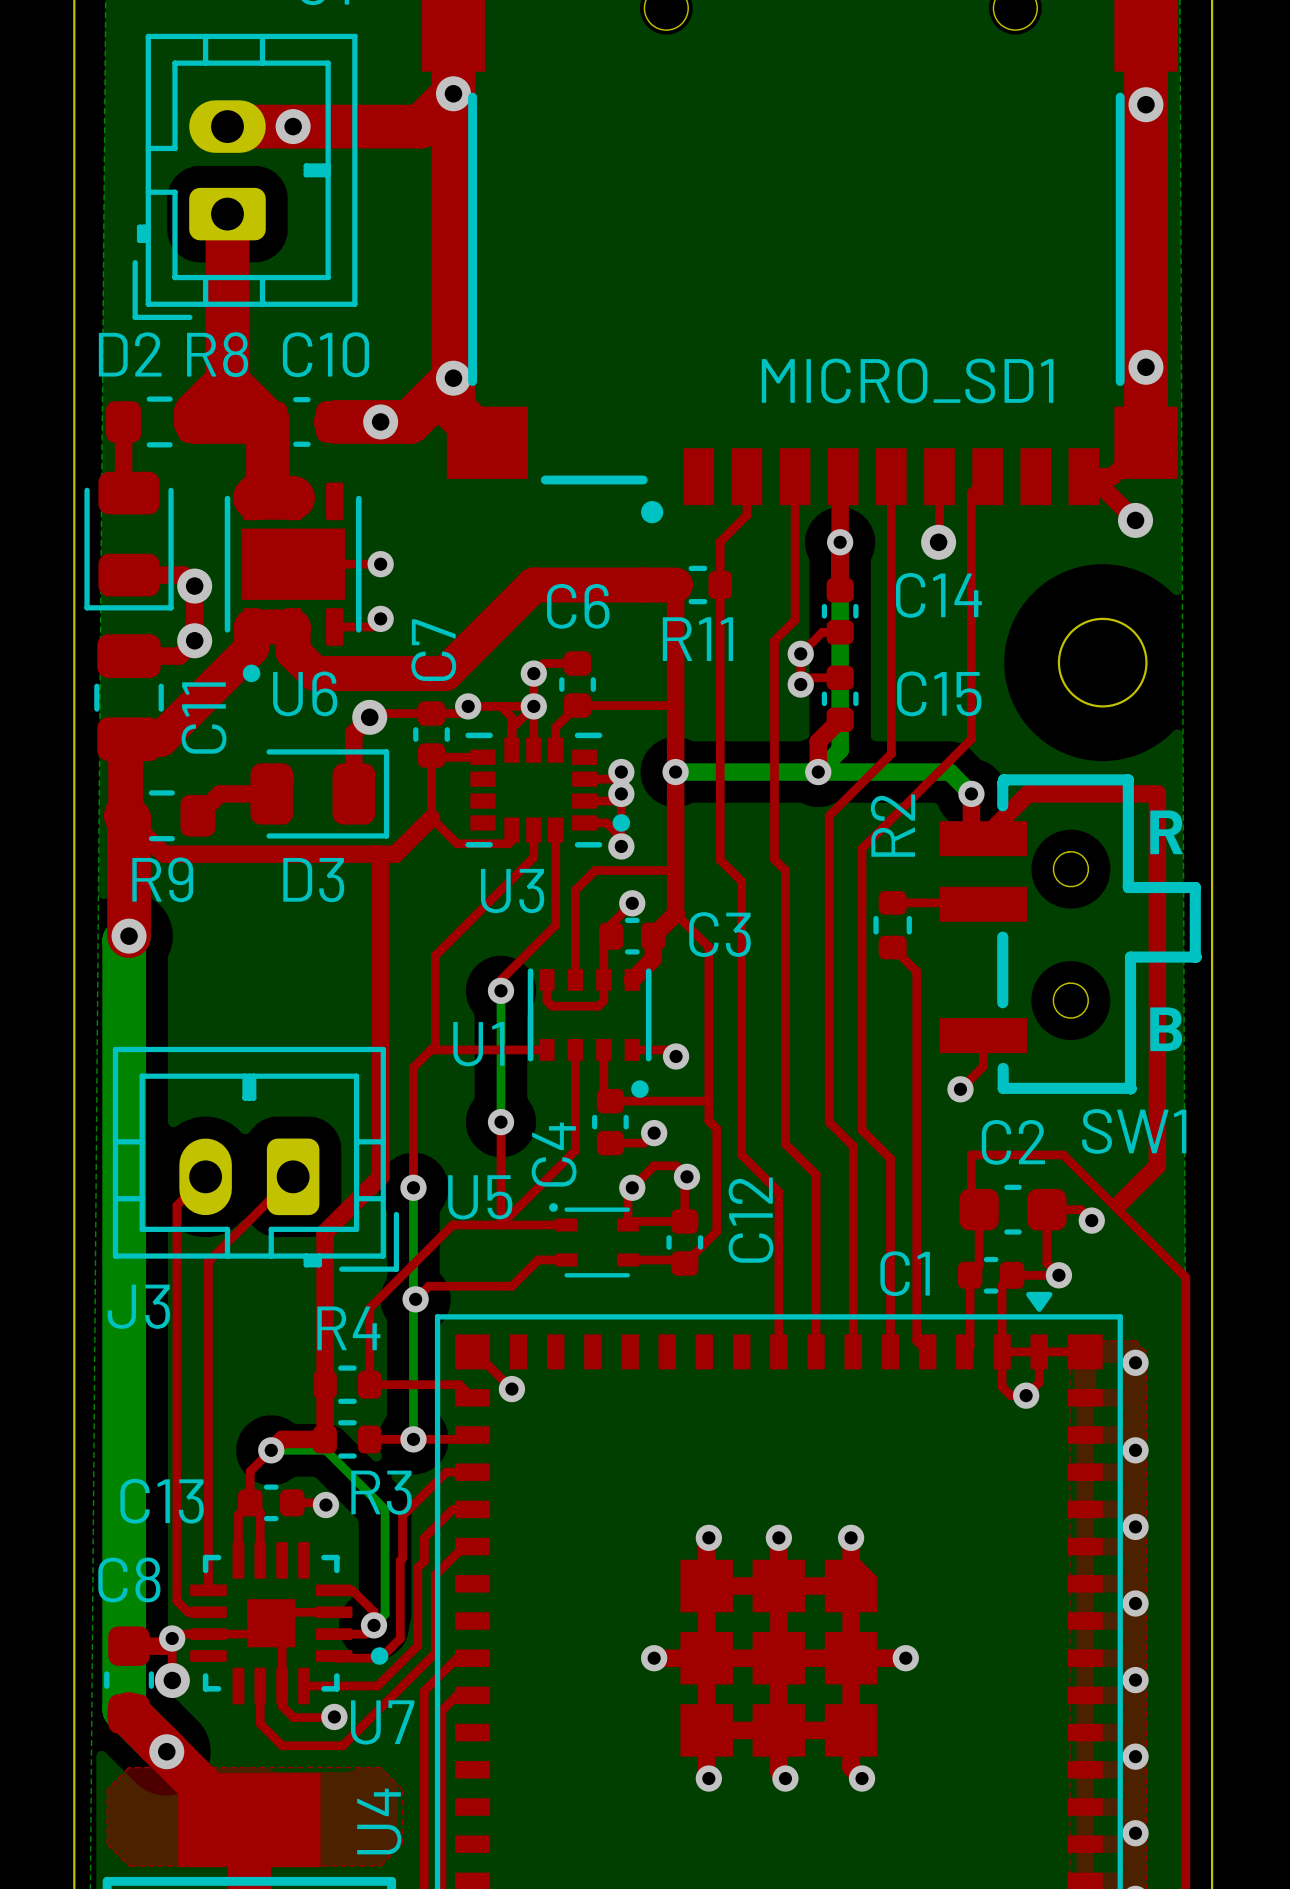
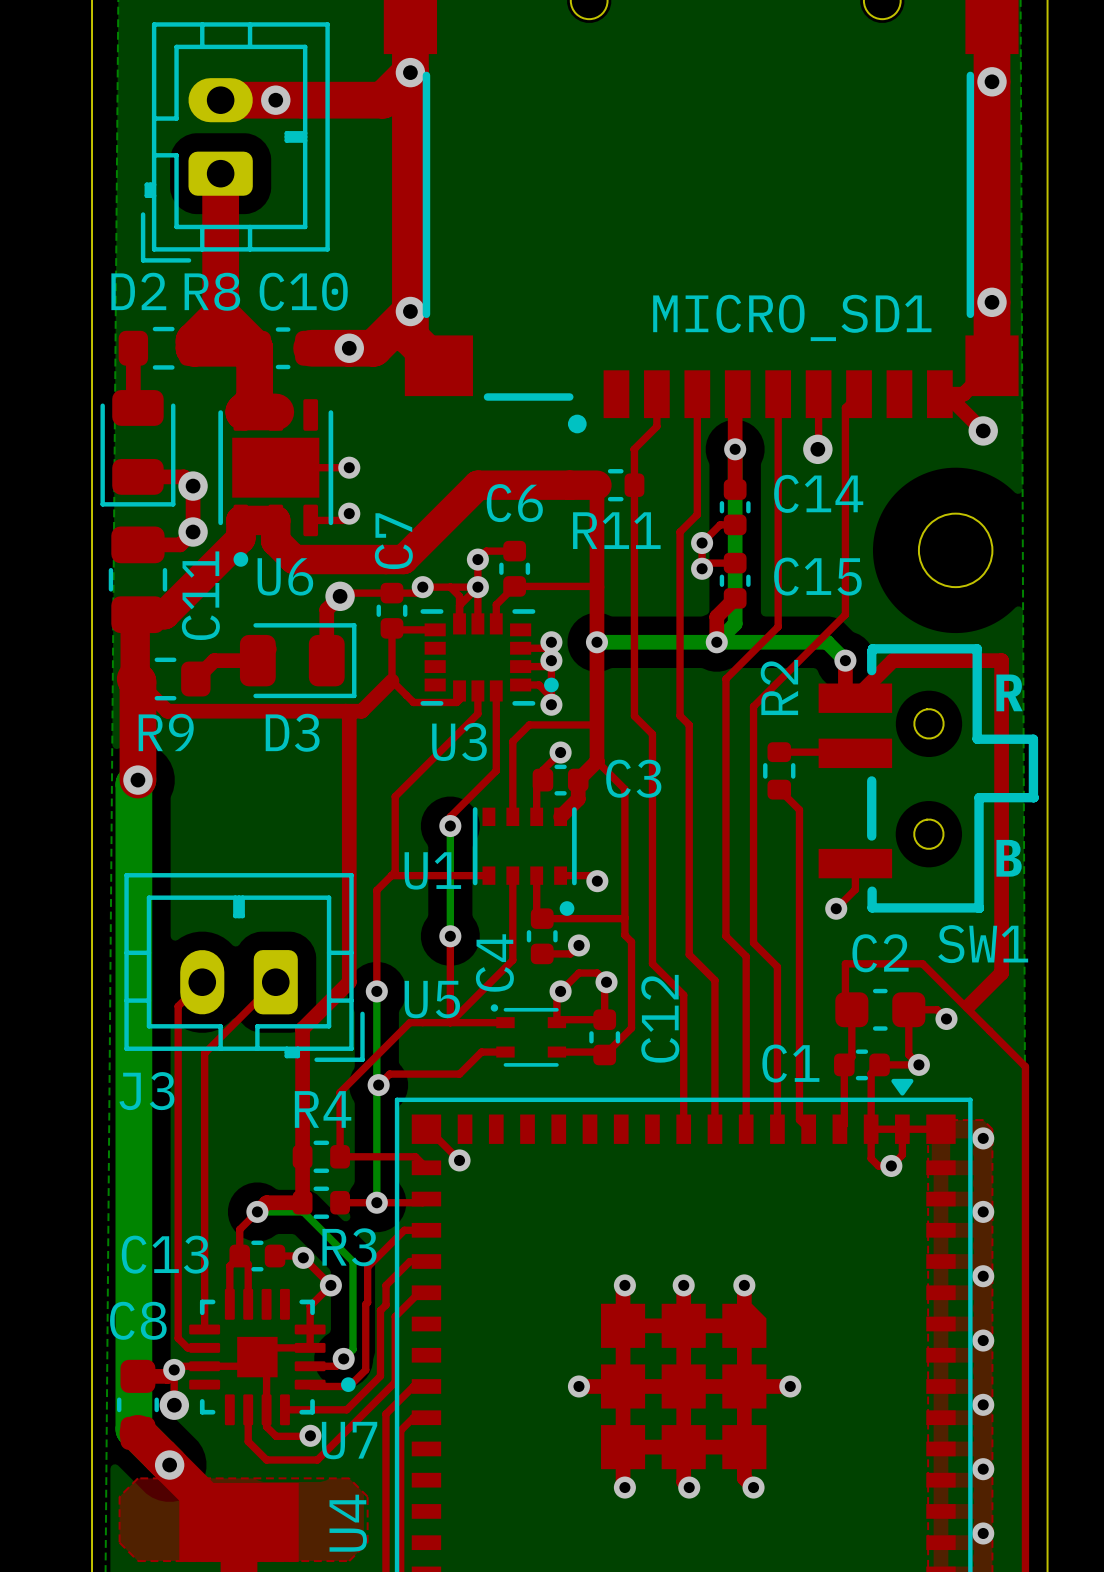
top track: (546, 979) (546, 1000) (552, 1006) (598, 1006) (603, 1000) (603, 979) -> none
top track: none -> (301, 1256) (330, 1285) (310, 1306) (310, 1347)
via: none -> (330, 1285)
top track: (334, 1590) (352, 1590) (374, 1611) (374, 1625) -> none

